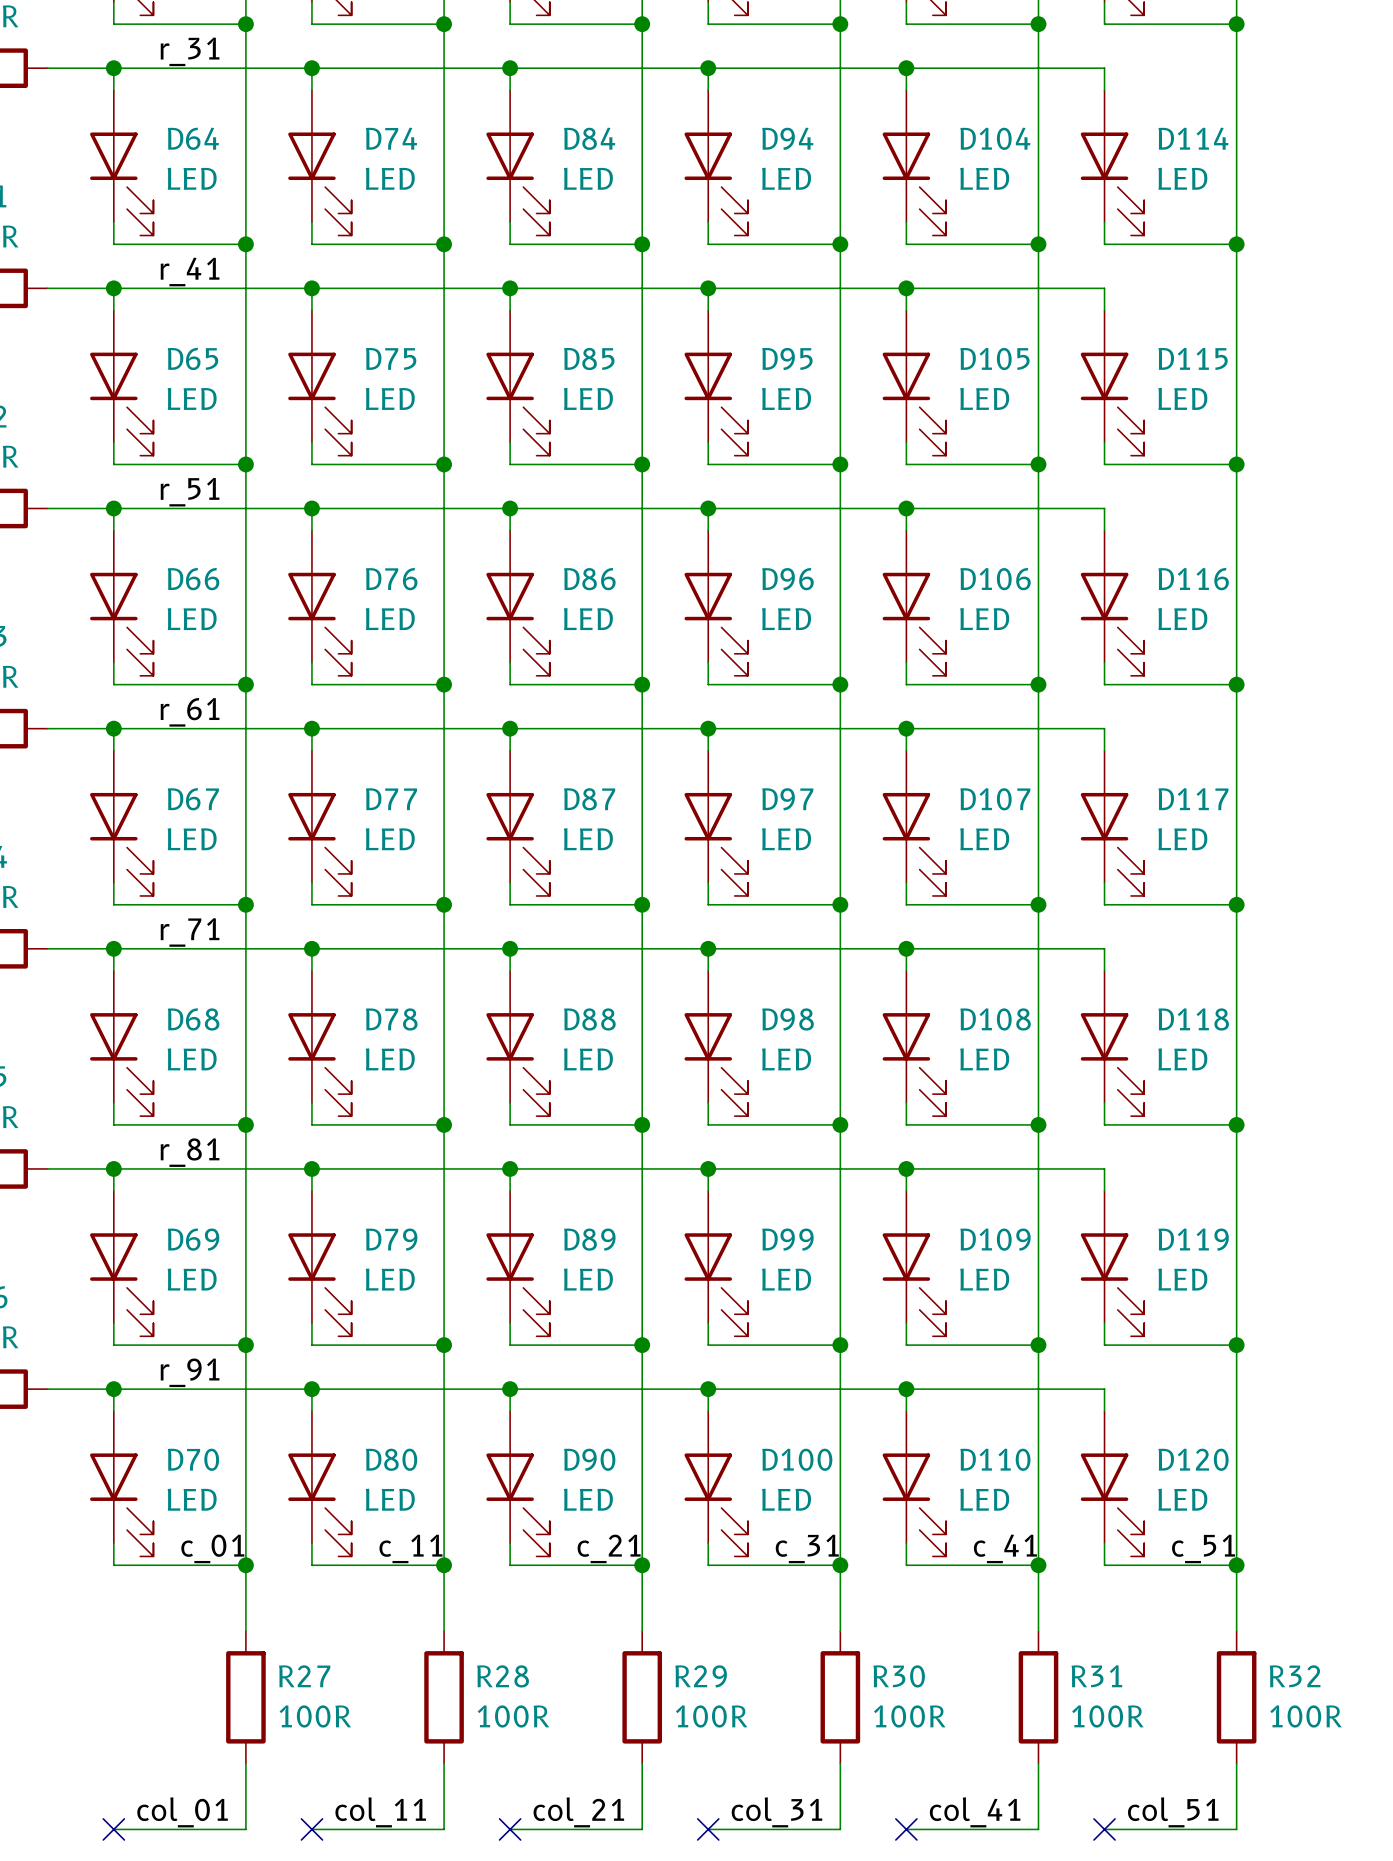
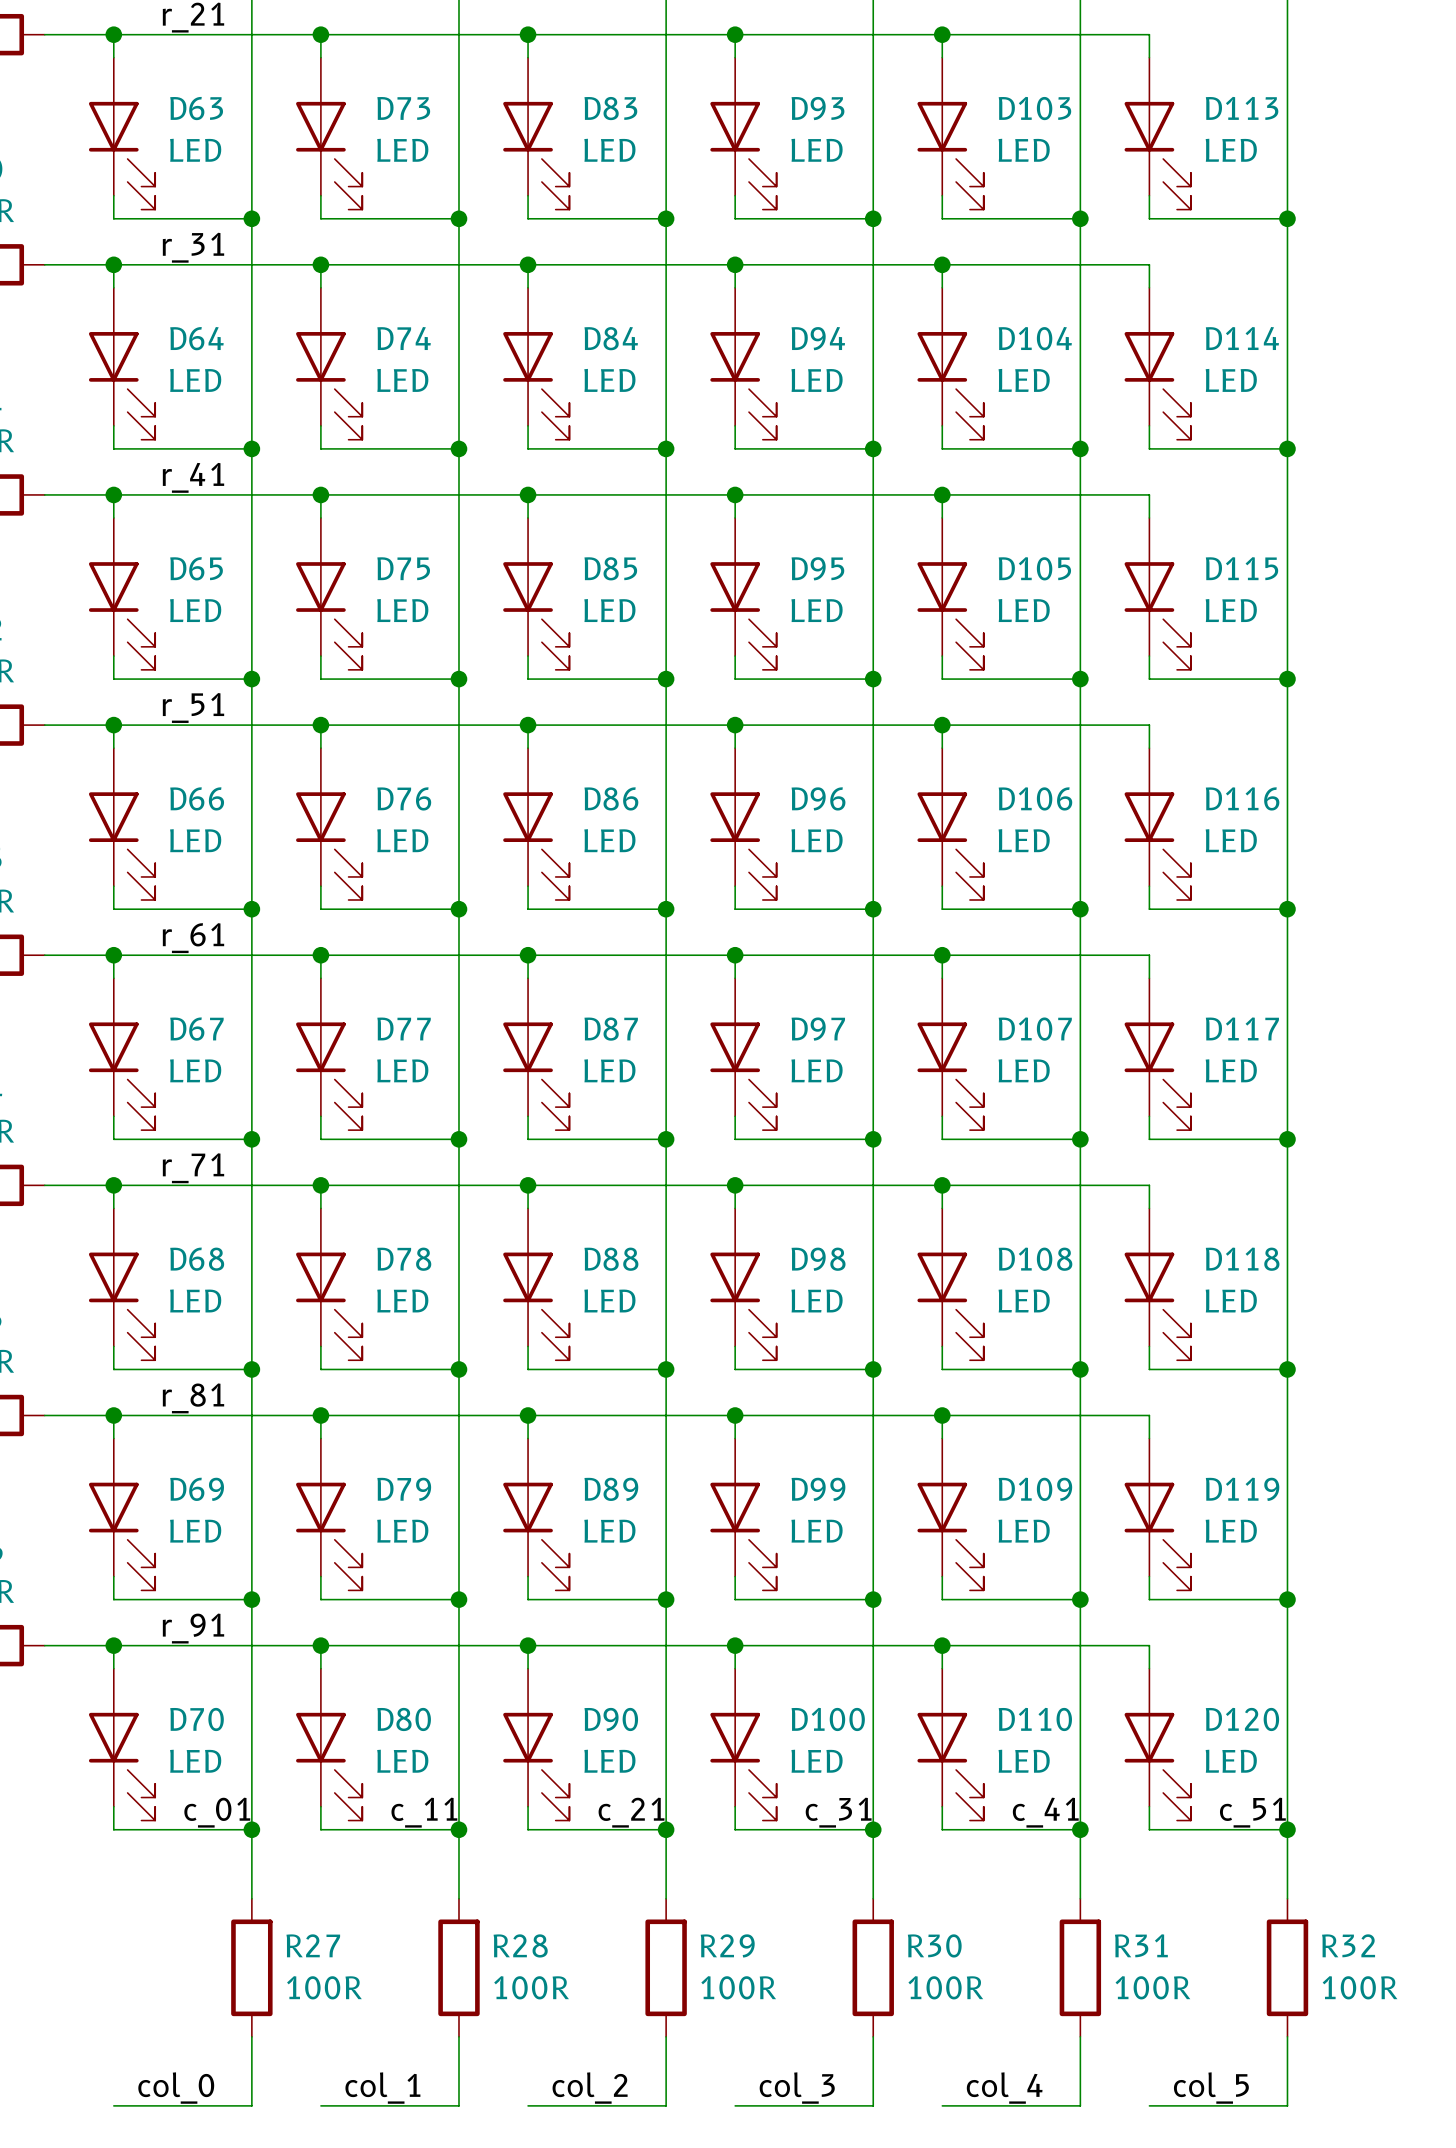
label: col_01 (182, 1812) -> col_0 (176, 2088)
label: col_11 (380, 1812) -> col_1 (382, 2088)
label: col_21 (578, 1812) -> col_2 (590, 2088)
label: col_31 (776, 1812) -> col_3 (797, 2088)
label: col_41 (975, 1812) -> col_4 (1004, 2088)
label: col_51 (1173, 1812) -> col_5 (1211, 2088)
no-connect mark: (113, 1829) -> none
no-connect mark: (311, 1829) -> none
no-connect mark: (510, 1829) -> none
no-connect mark: (708, 1829) -> none
no-connect mark: (906, 1829) -> none
no-connect mark: (1104, 1829) -> none

